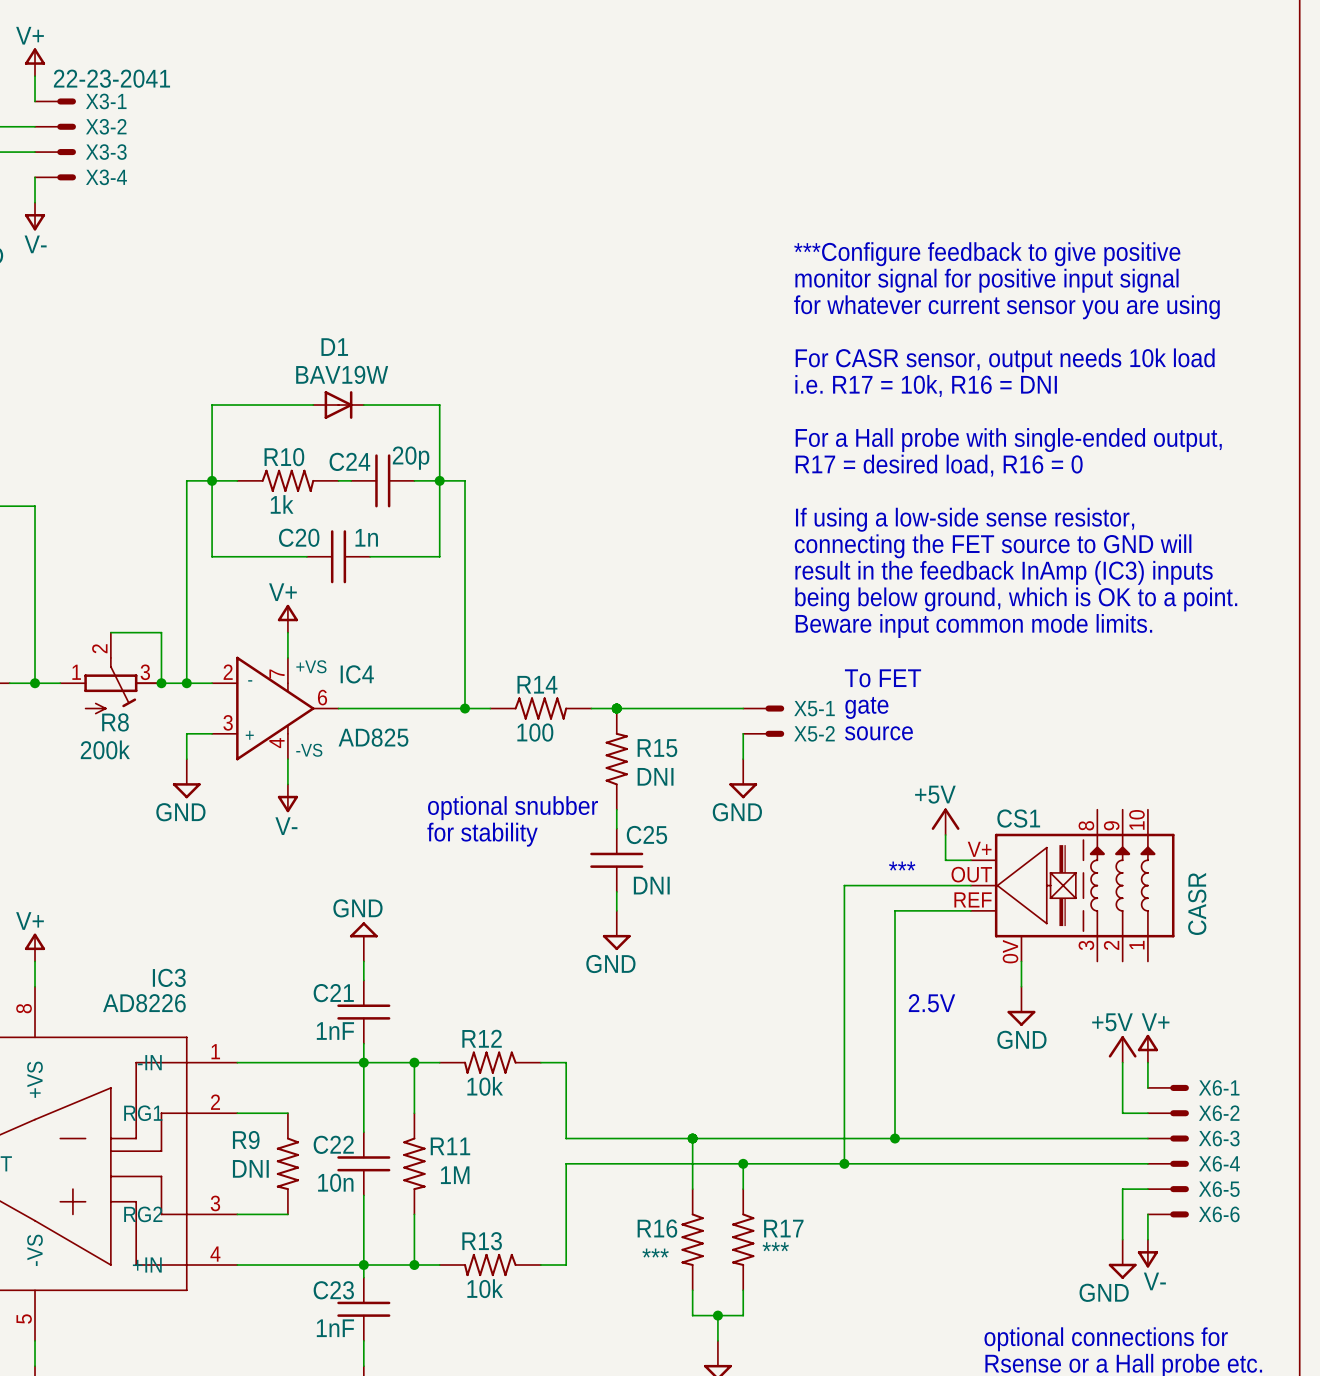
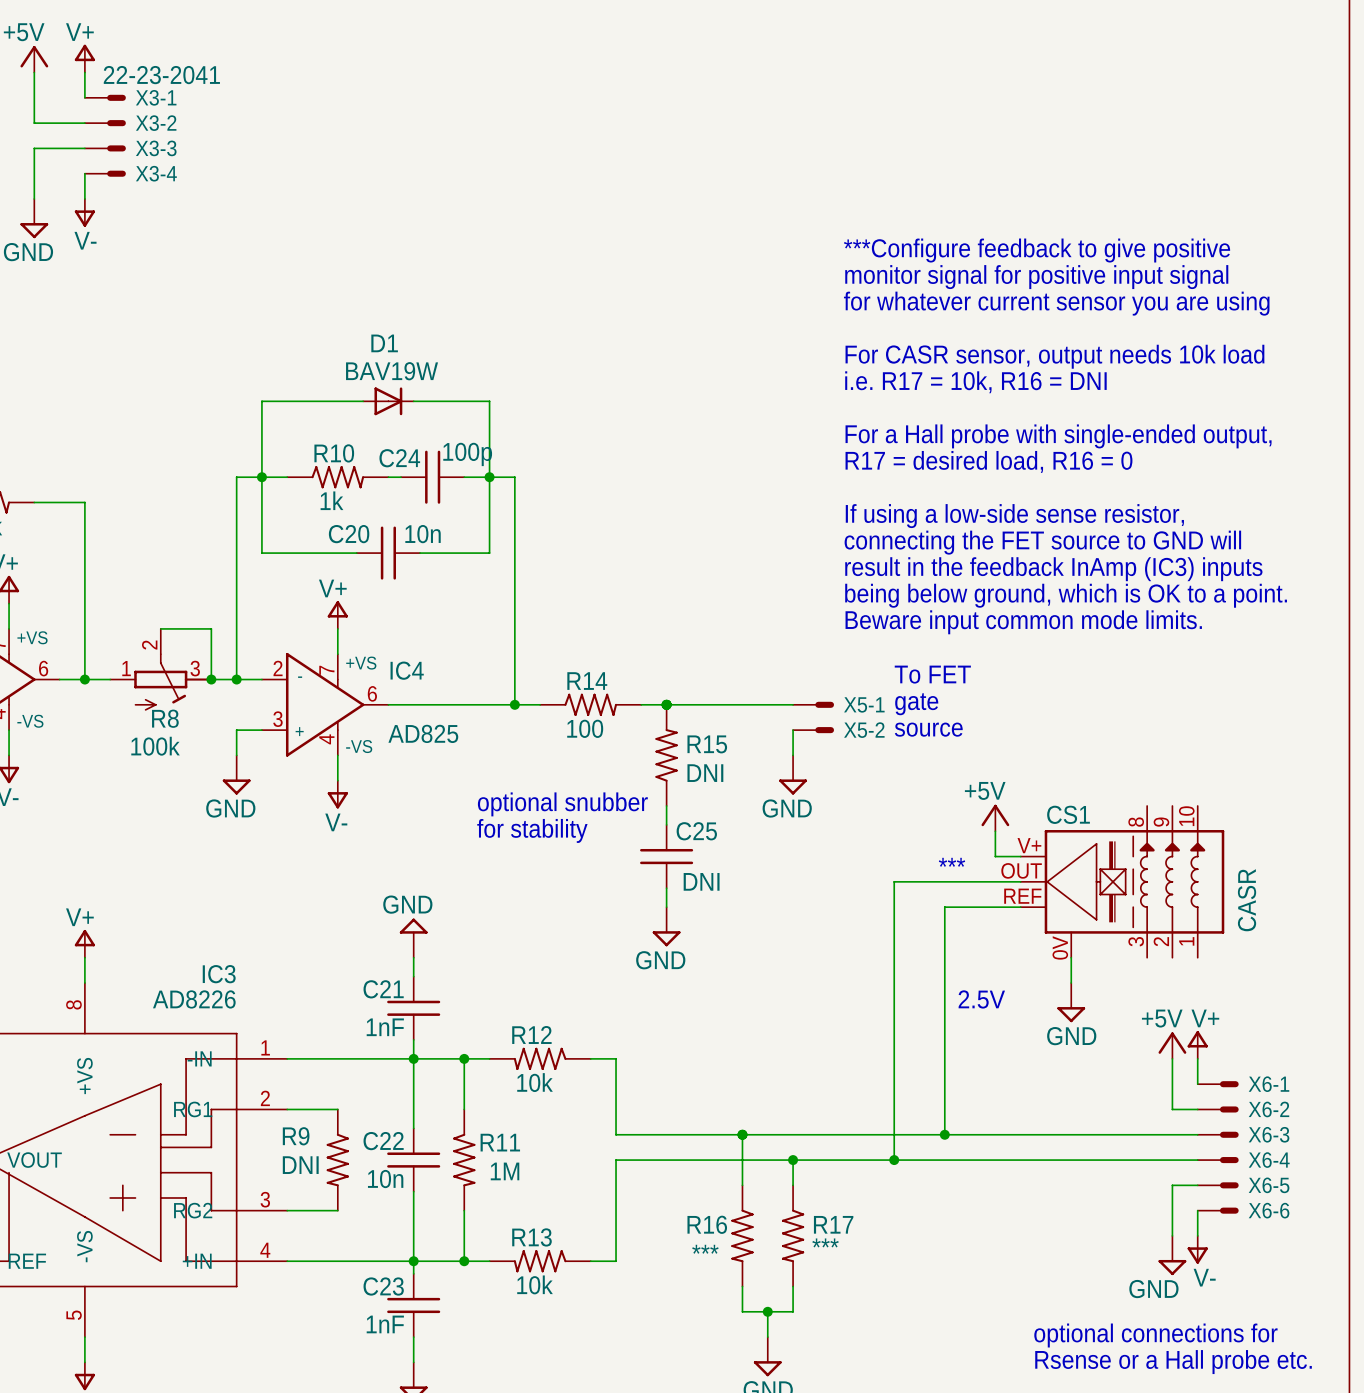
C24 value: 20p (411, 458) -> 100p (467, 454)
C20 value: 1n (366, 537) -> 10n (423, 534)
R8 value: 200k (105, 749) -> 100k (155, 746)

